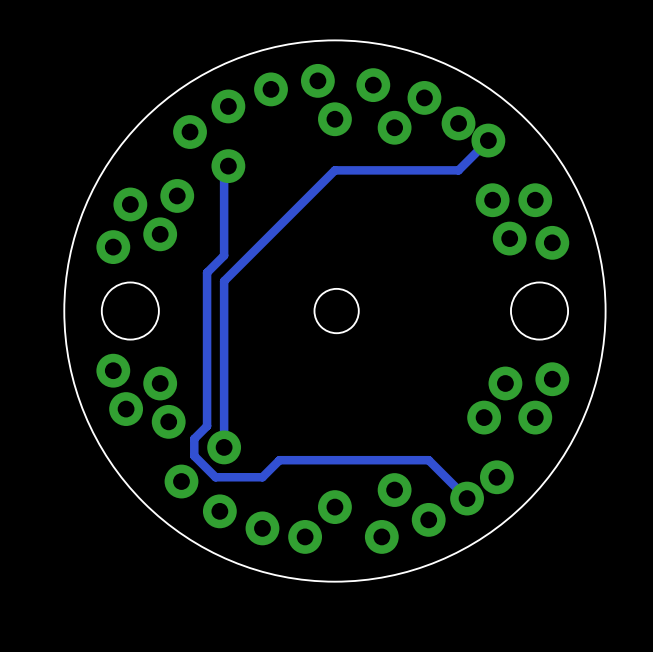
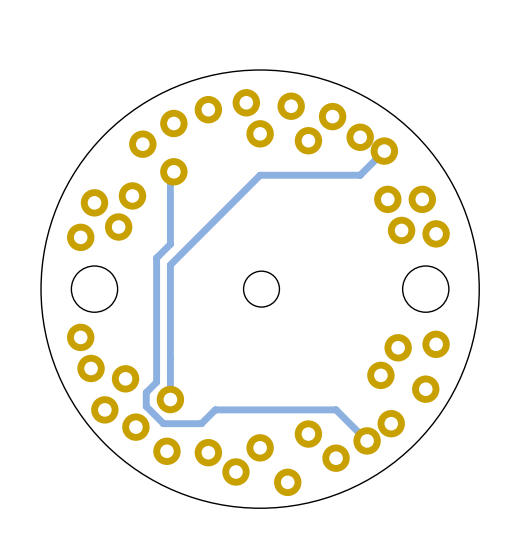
part position: (160, 383) -> (104, 409)
part position: (535, 417) -> (425, 389)
part position: (262, 528) -> (208, 452)
part position: (381, 536) -> (287, 482)

